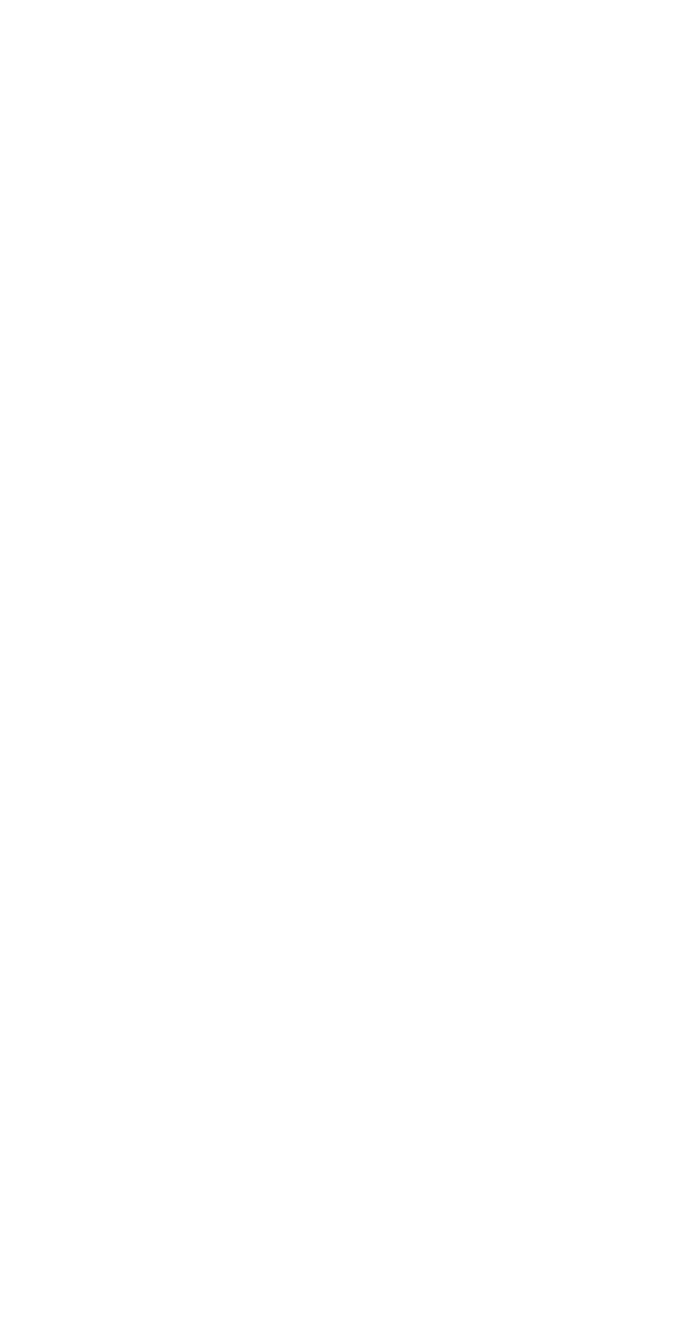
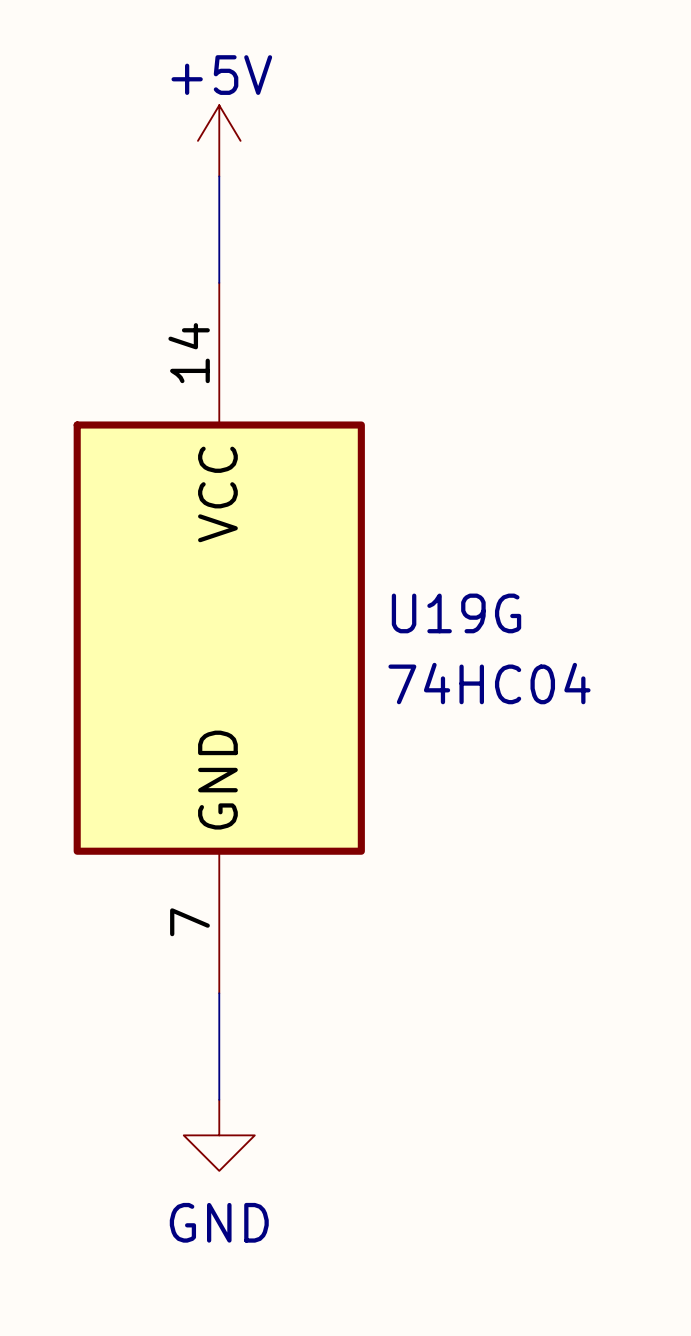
power symbol: none -> +5V (219, 140)
wire: none -> (219, 176) (219, 282)
U19G: none -> 74HC04 (219, 638)
wire: none -> (219, 993) (219, 1099)
power symbol: none -> GND (219, 1135)

